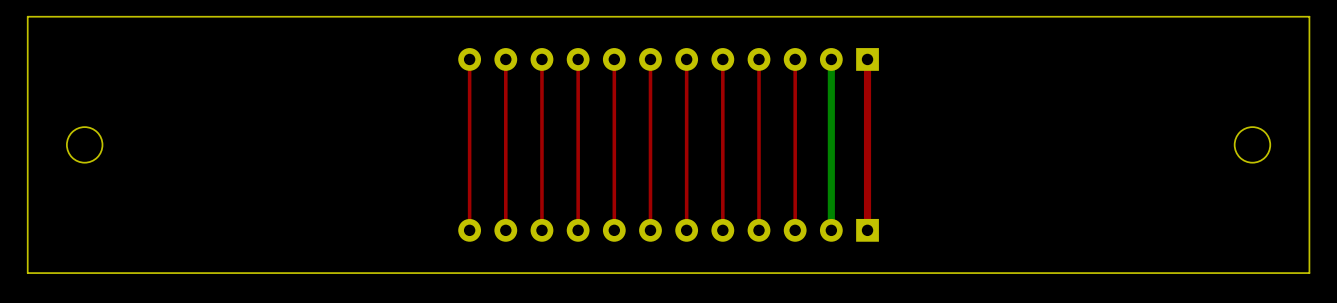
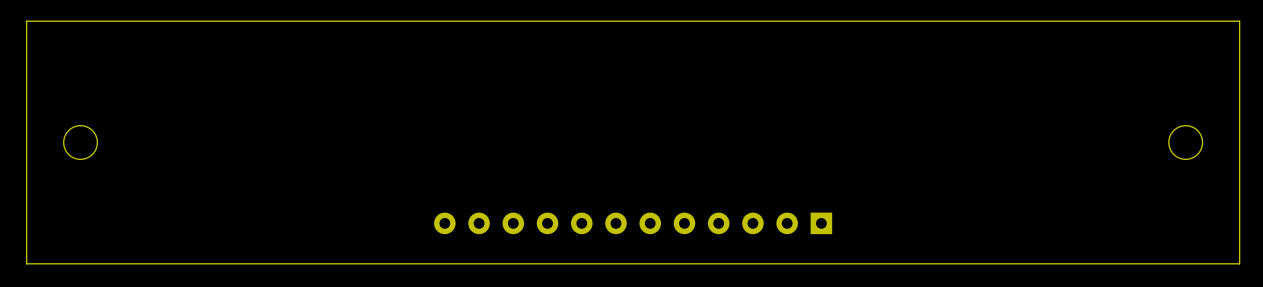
top track: (469, 59) (469, 230) -> none
top track: (505, 59) (505, 230) -> none
top track: (541, 59) (541, 230) -> none
top track: (578, 59) (578, 230) -> none
top track: (614, 59) (614, 230) -> none
top track: (650, 59) (650, 230) -> none
part: (668, 59) -> none
top track: (686, 59) (686, 230) -> none
top track: (722, 59) (722, 230) -> none
top track: (759, 59) (759, 230) -> none
top track: (795, 59) (795, 230) -> none
bottom track: (831, 59) (831, 230) -> none
top track: (867, 59) (867, 230) -> none

